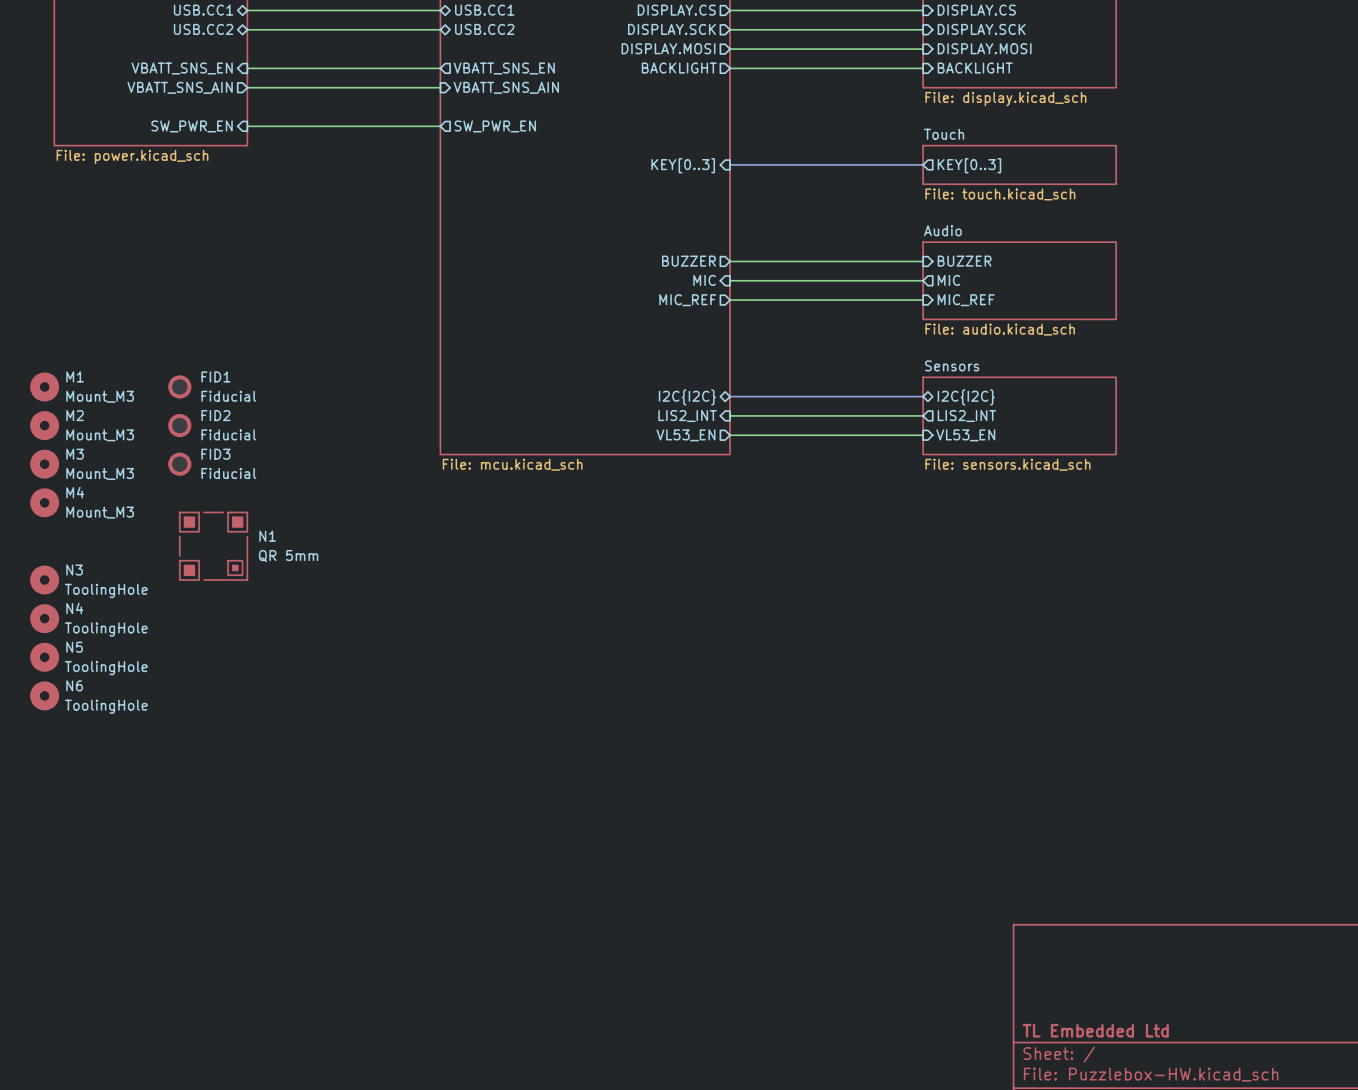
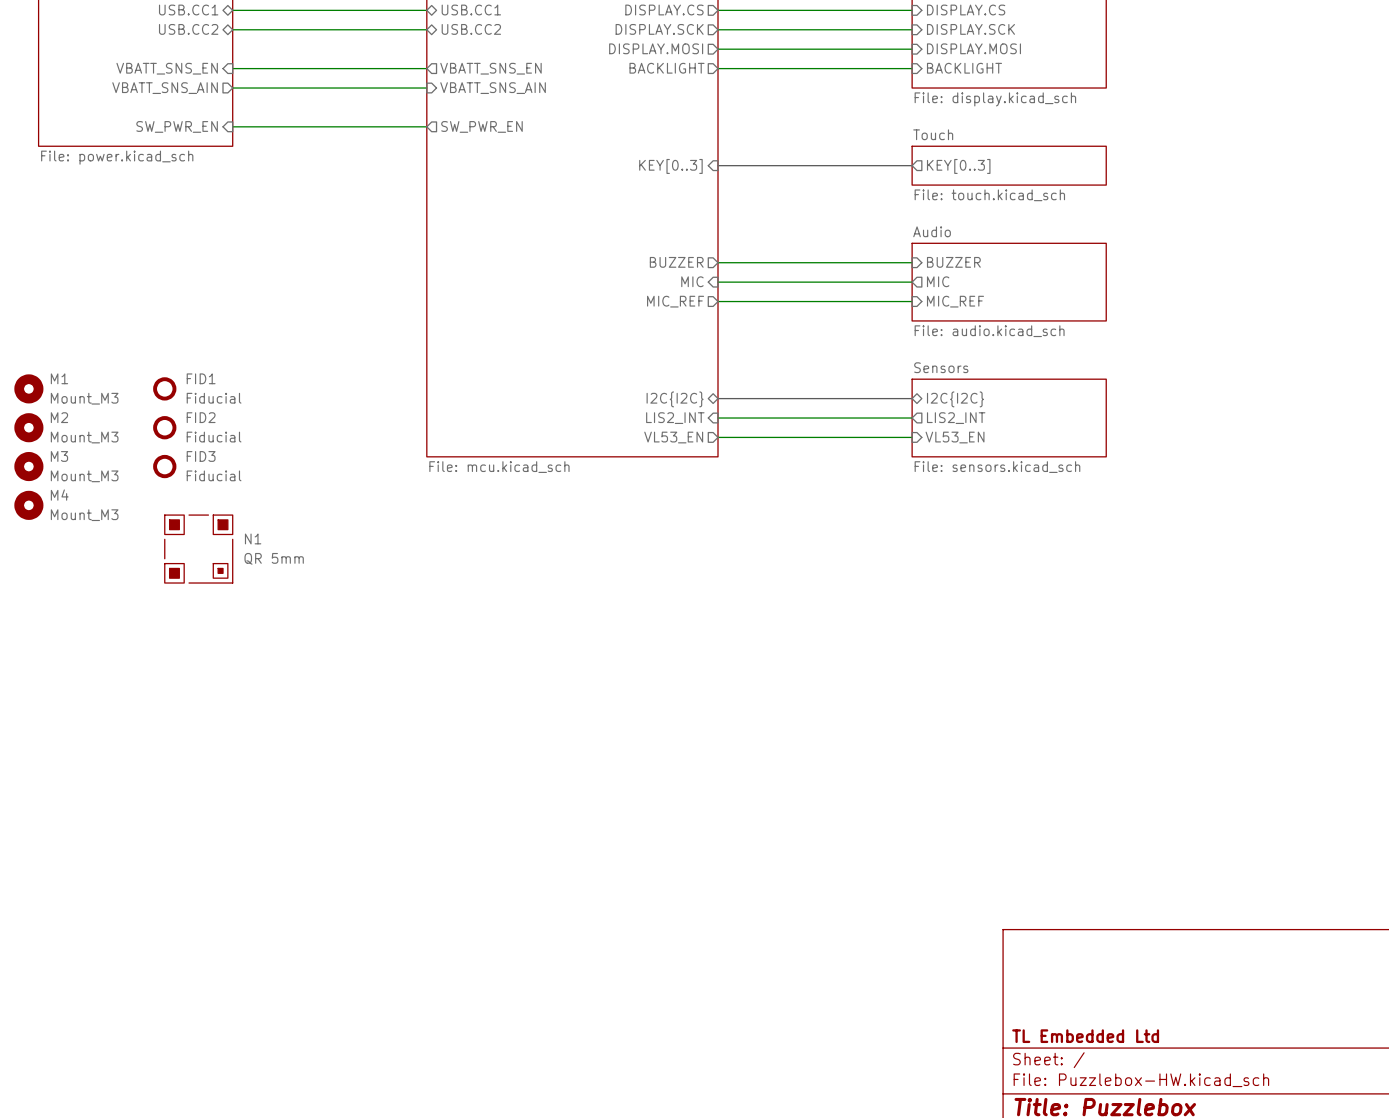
N3: ToolingHole (44, 580) -> none
N4: ToolingHole (44, 618) -> none
N5: ToolingHole (44, 657) -> none
N6: ToolingHole (44, 695) -> none

